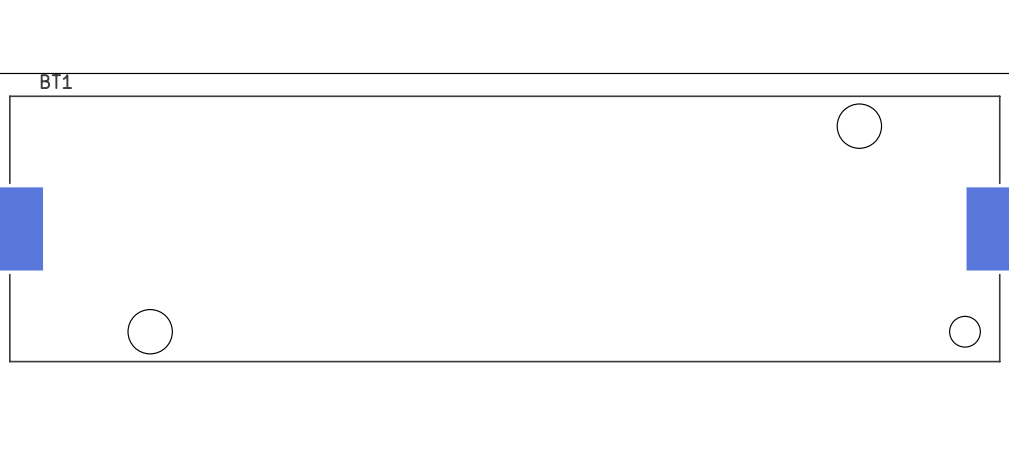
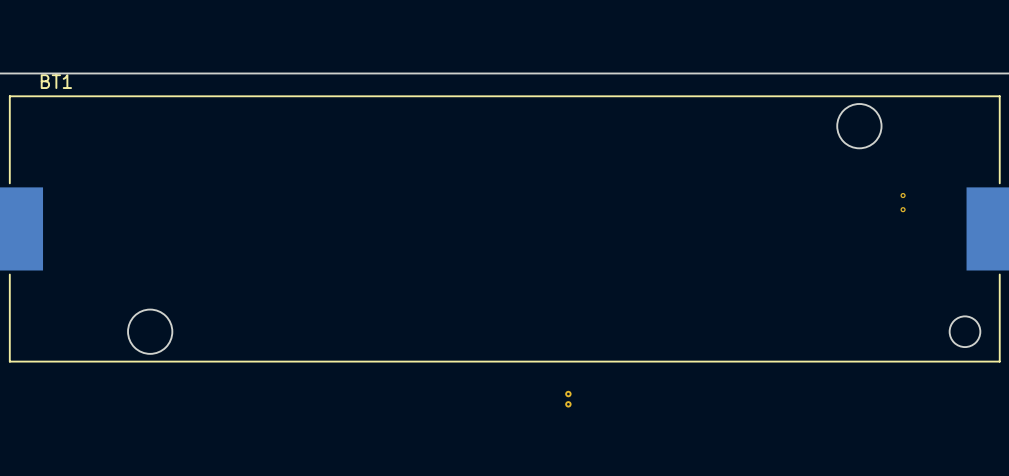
part: none -> (903, 202)
part: none -> (568, 399)

